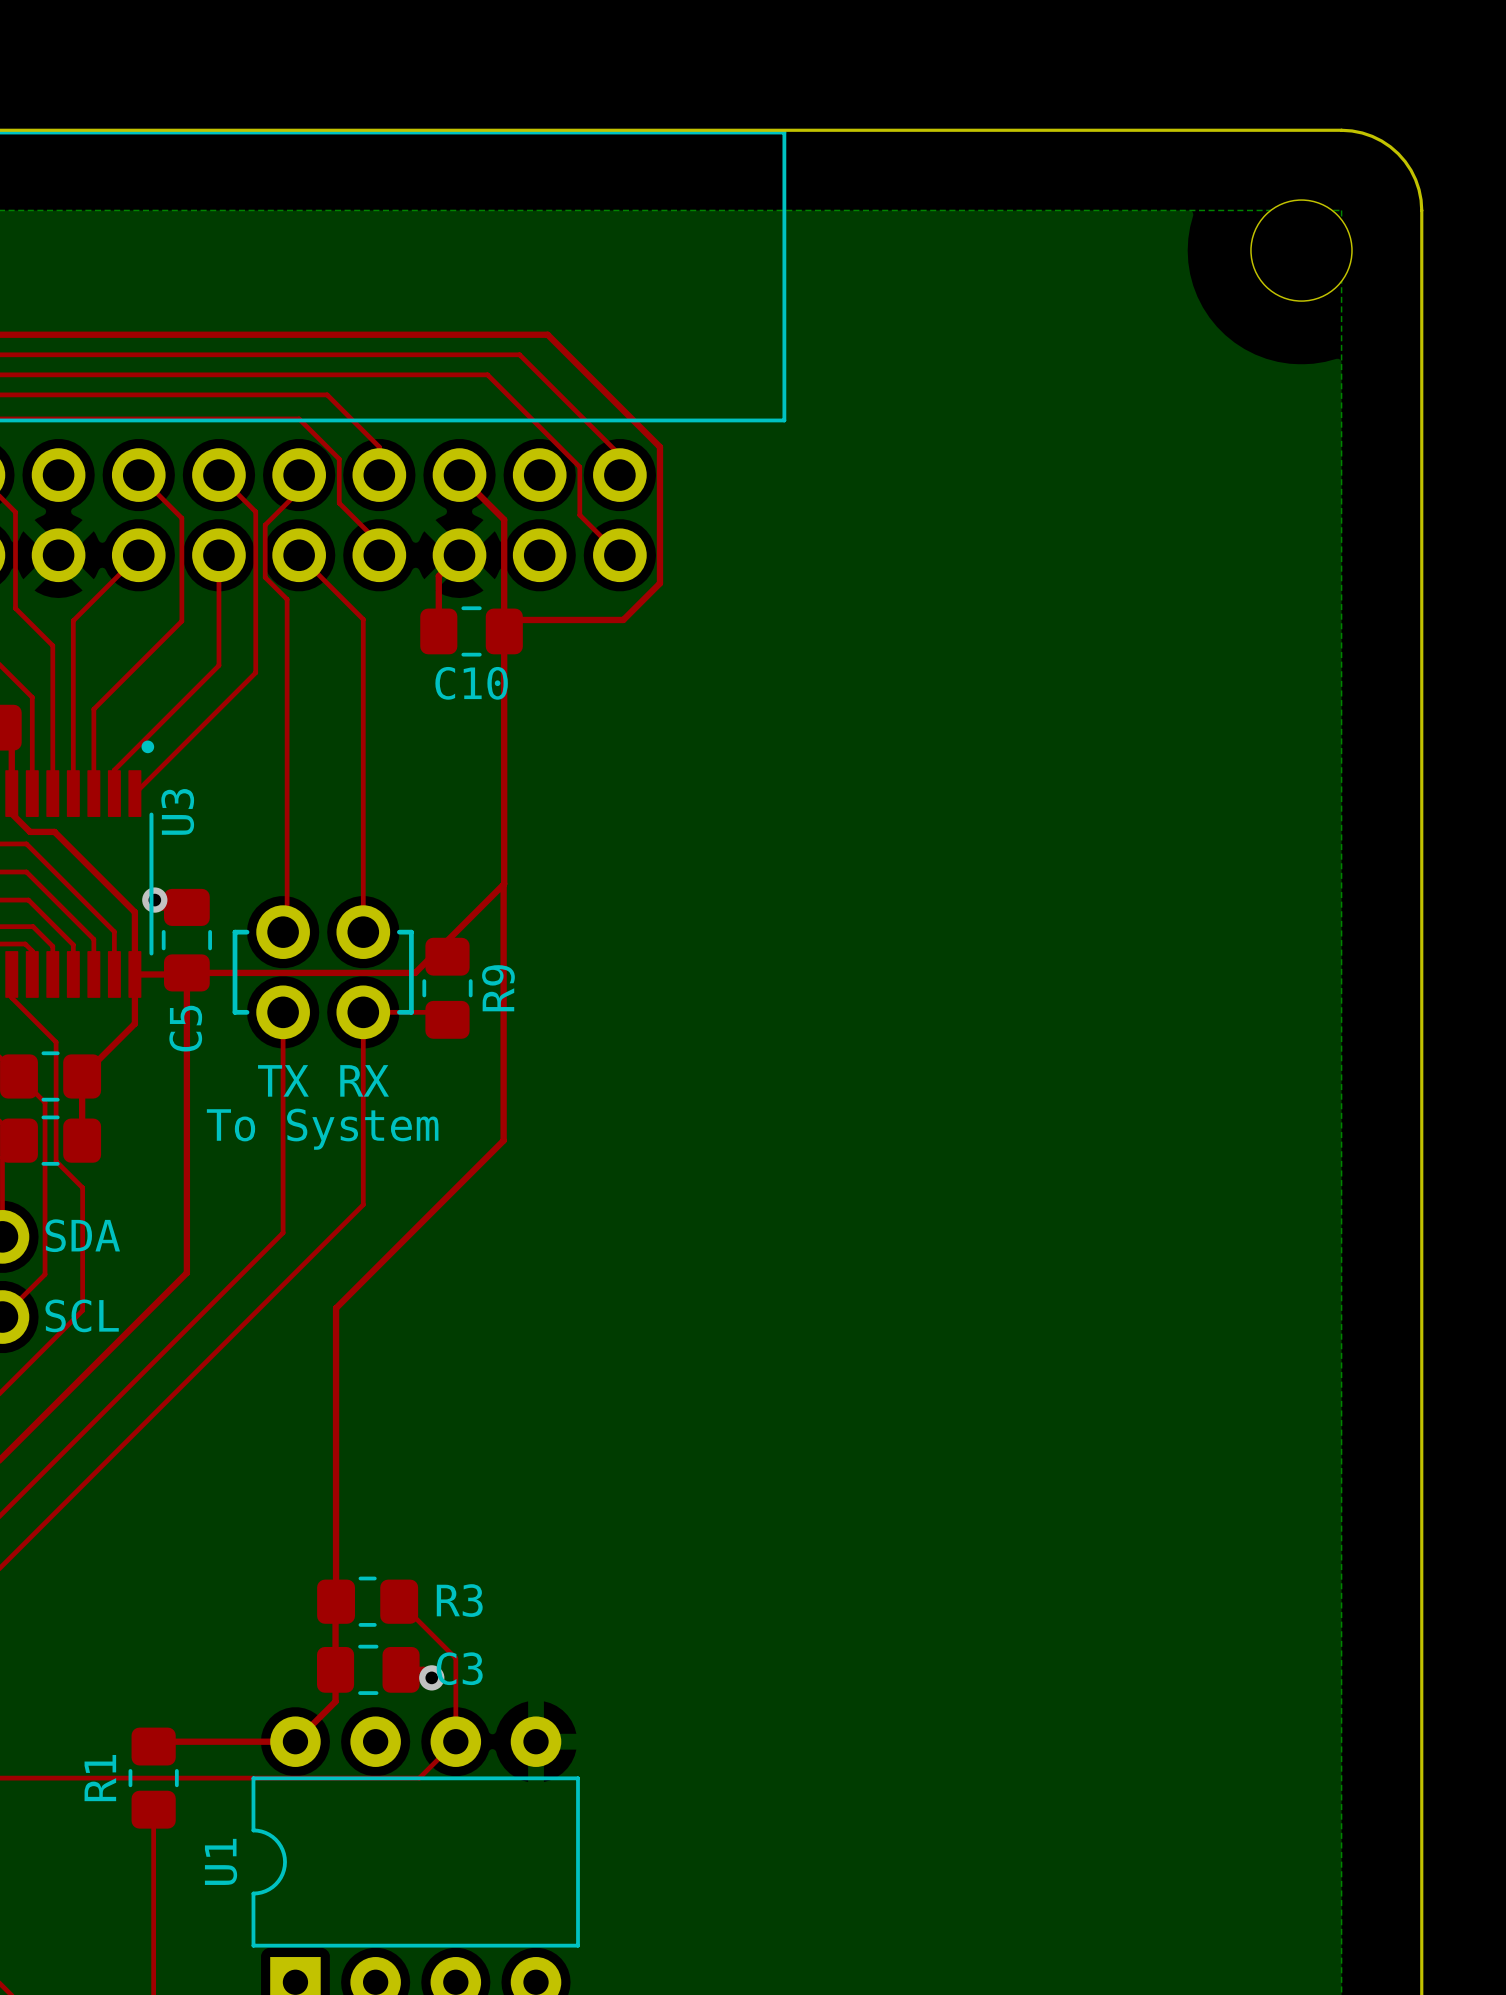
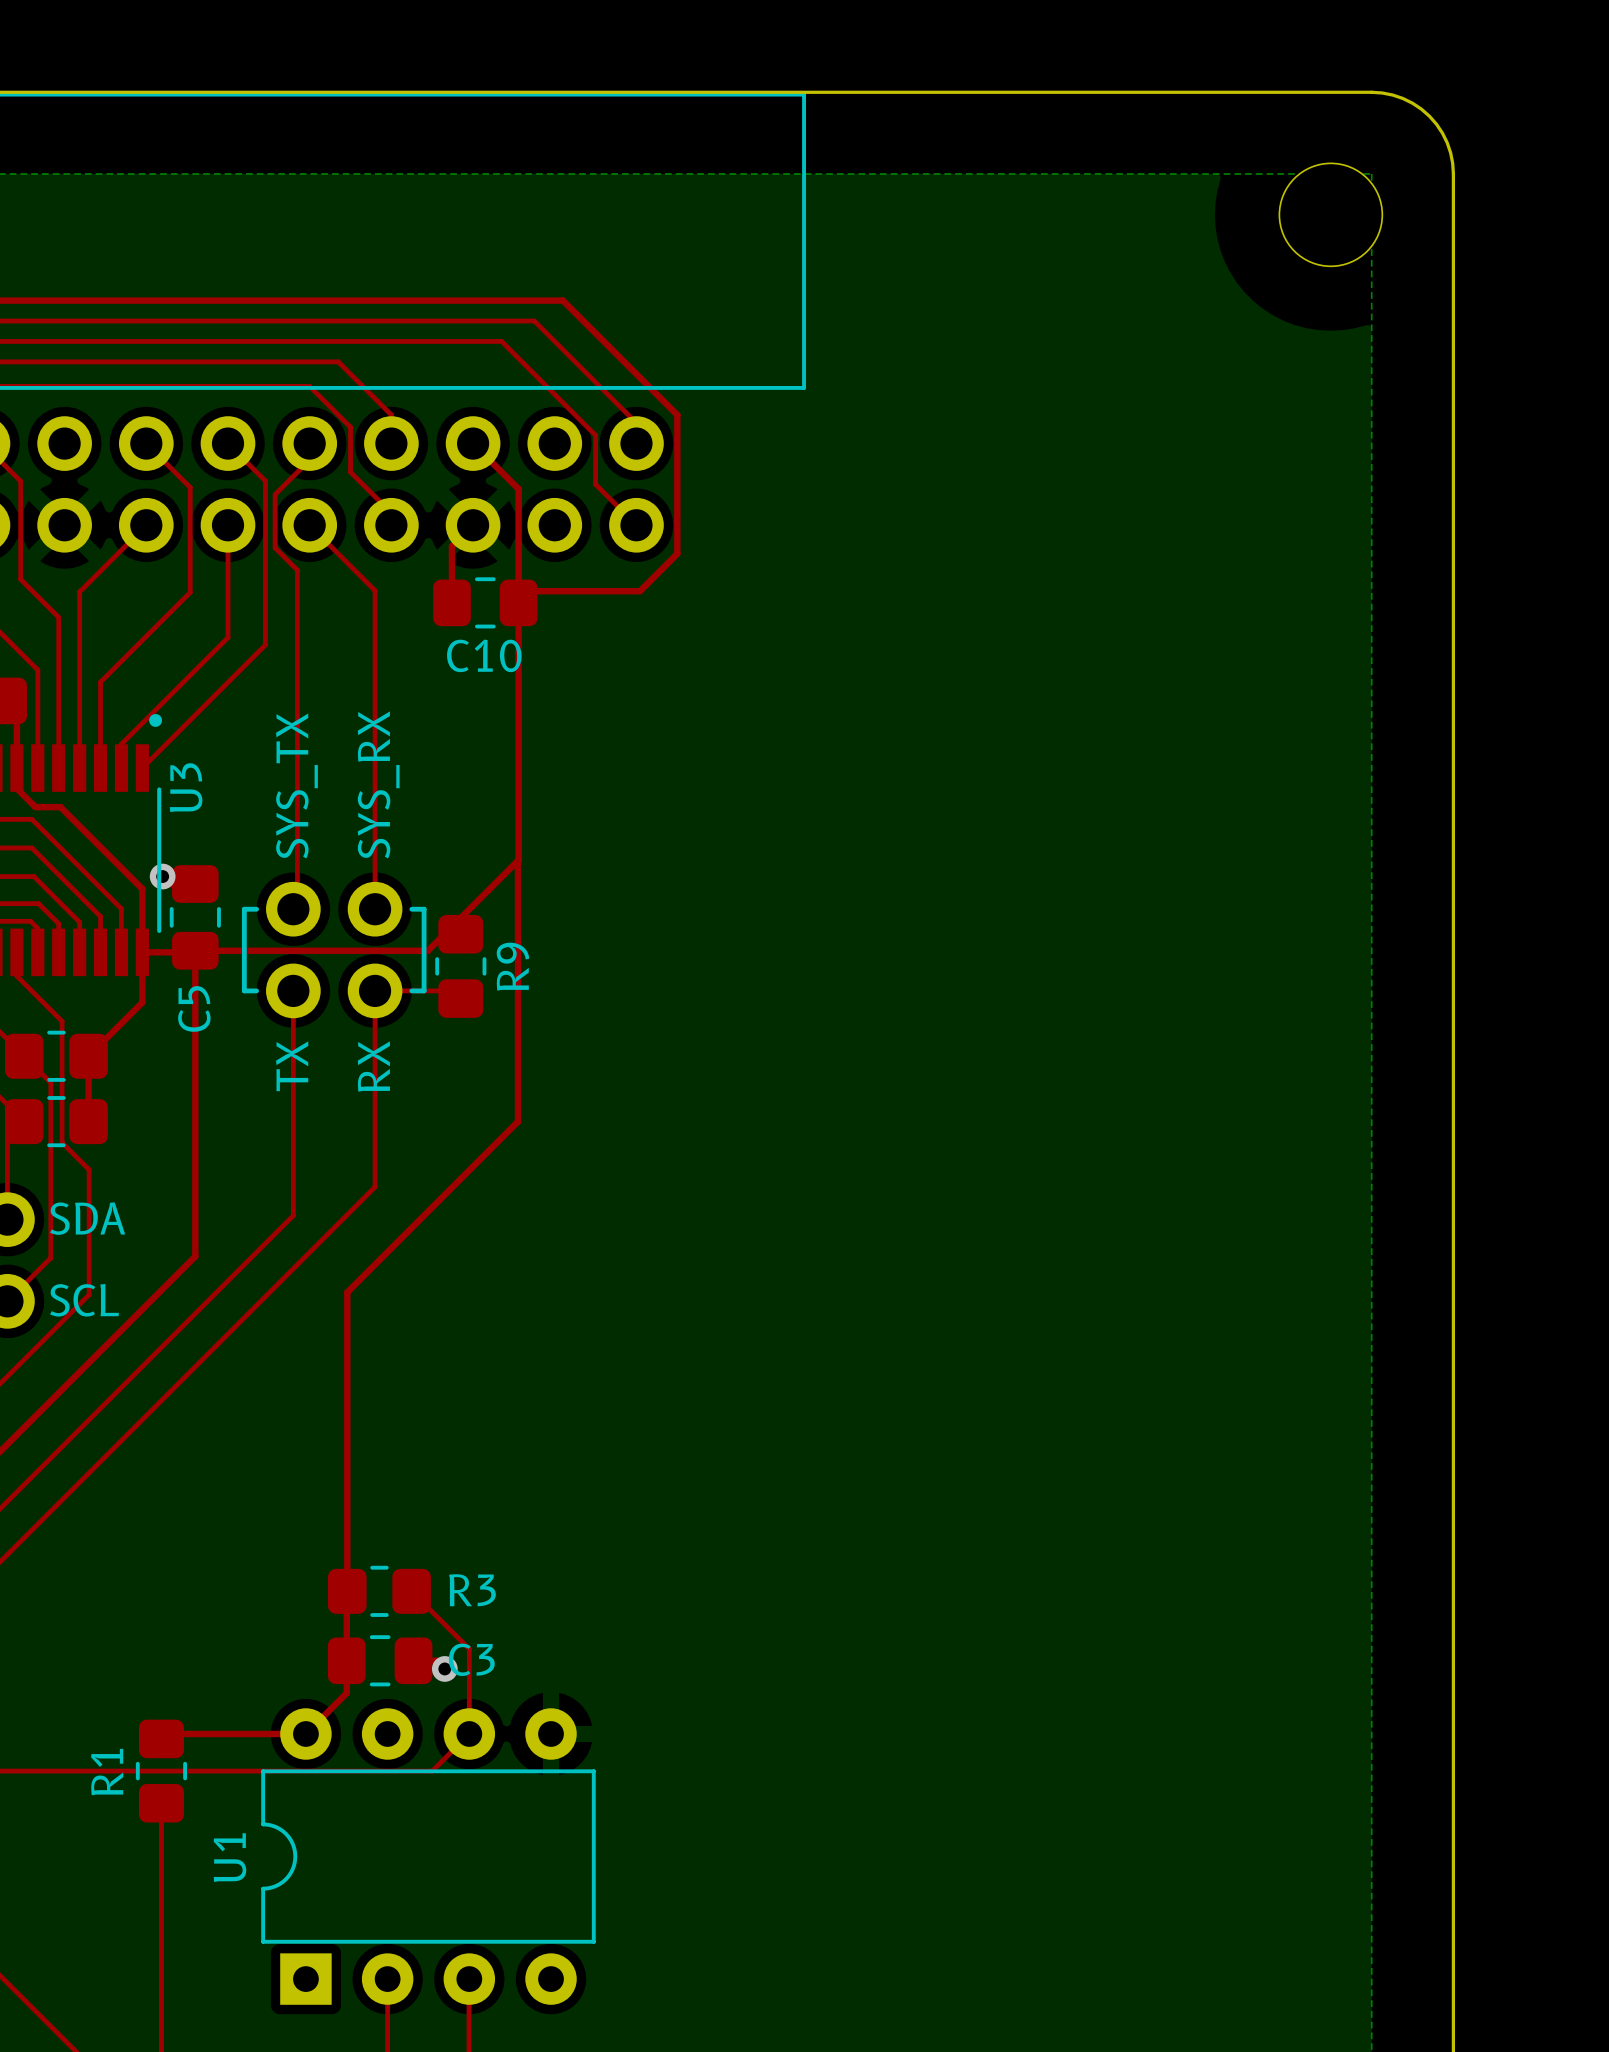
text: none -> SYS_TX (296, 785)
text: none -> SYS_RX (378, 784)
text rotation: 0° (283, 1080) -> 90° counterclockwise (292, 1066)
text rotation: 0° (364, 1080) -> 90° counterclockwise (373, 1066)
text: To System (322, 1129) -> none

